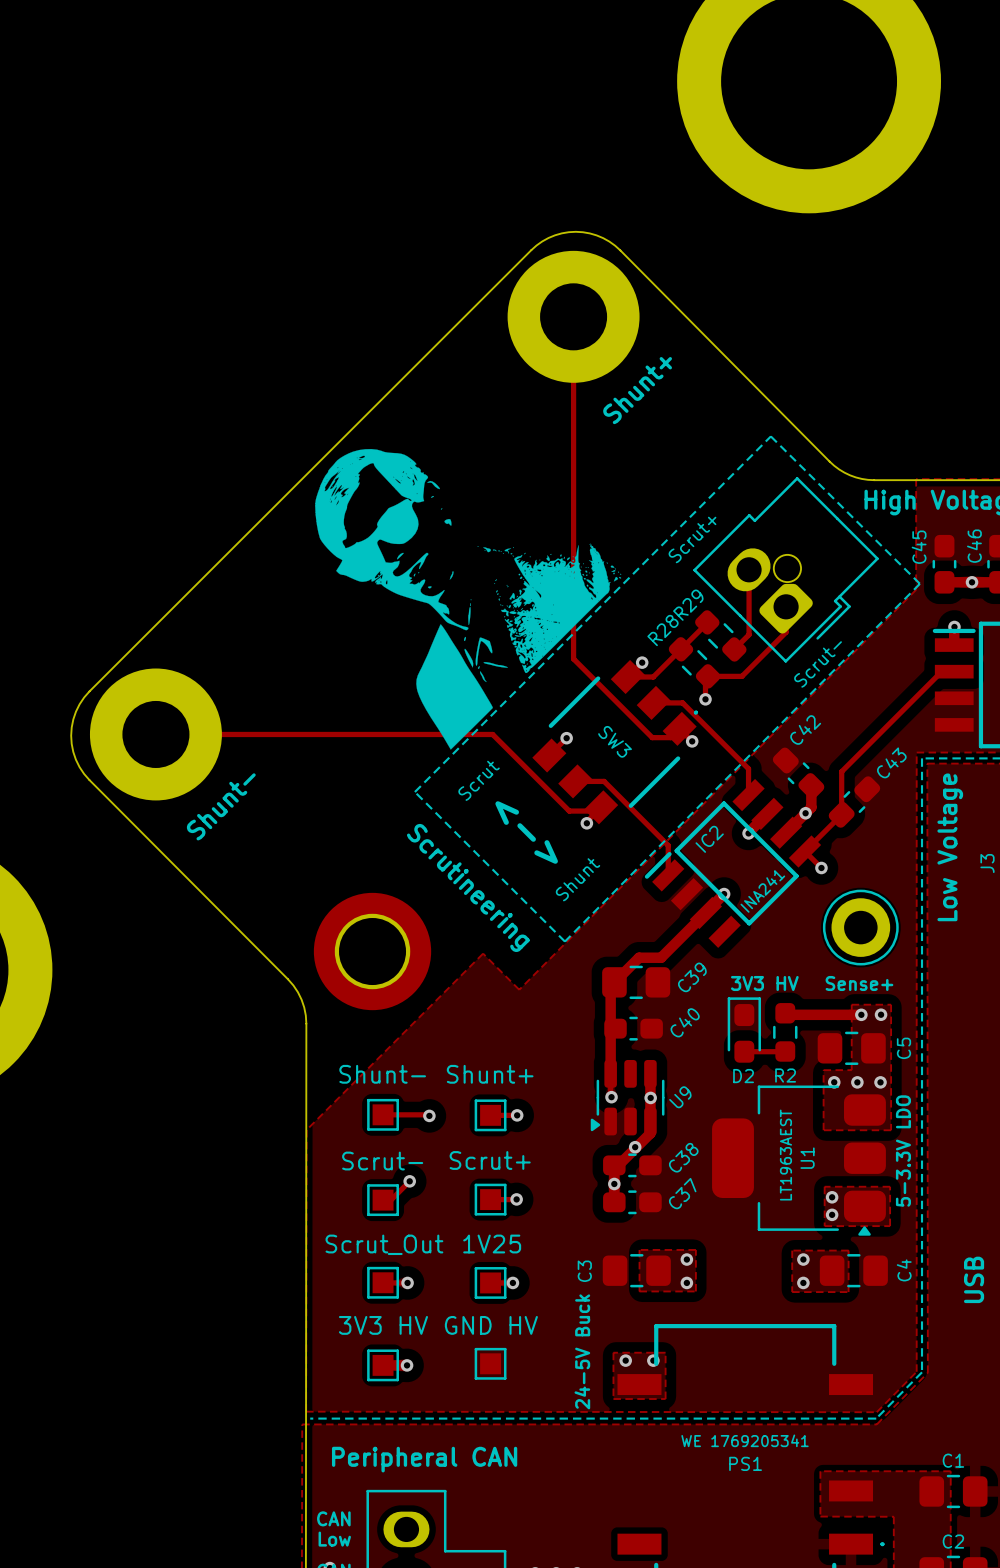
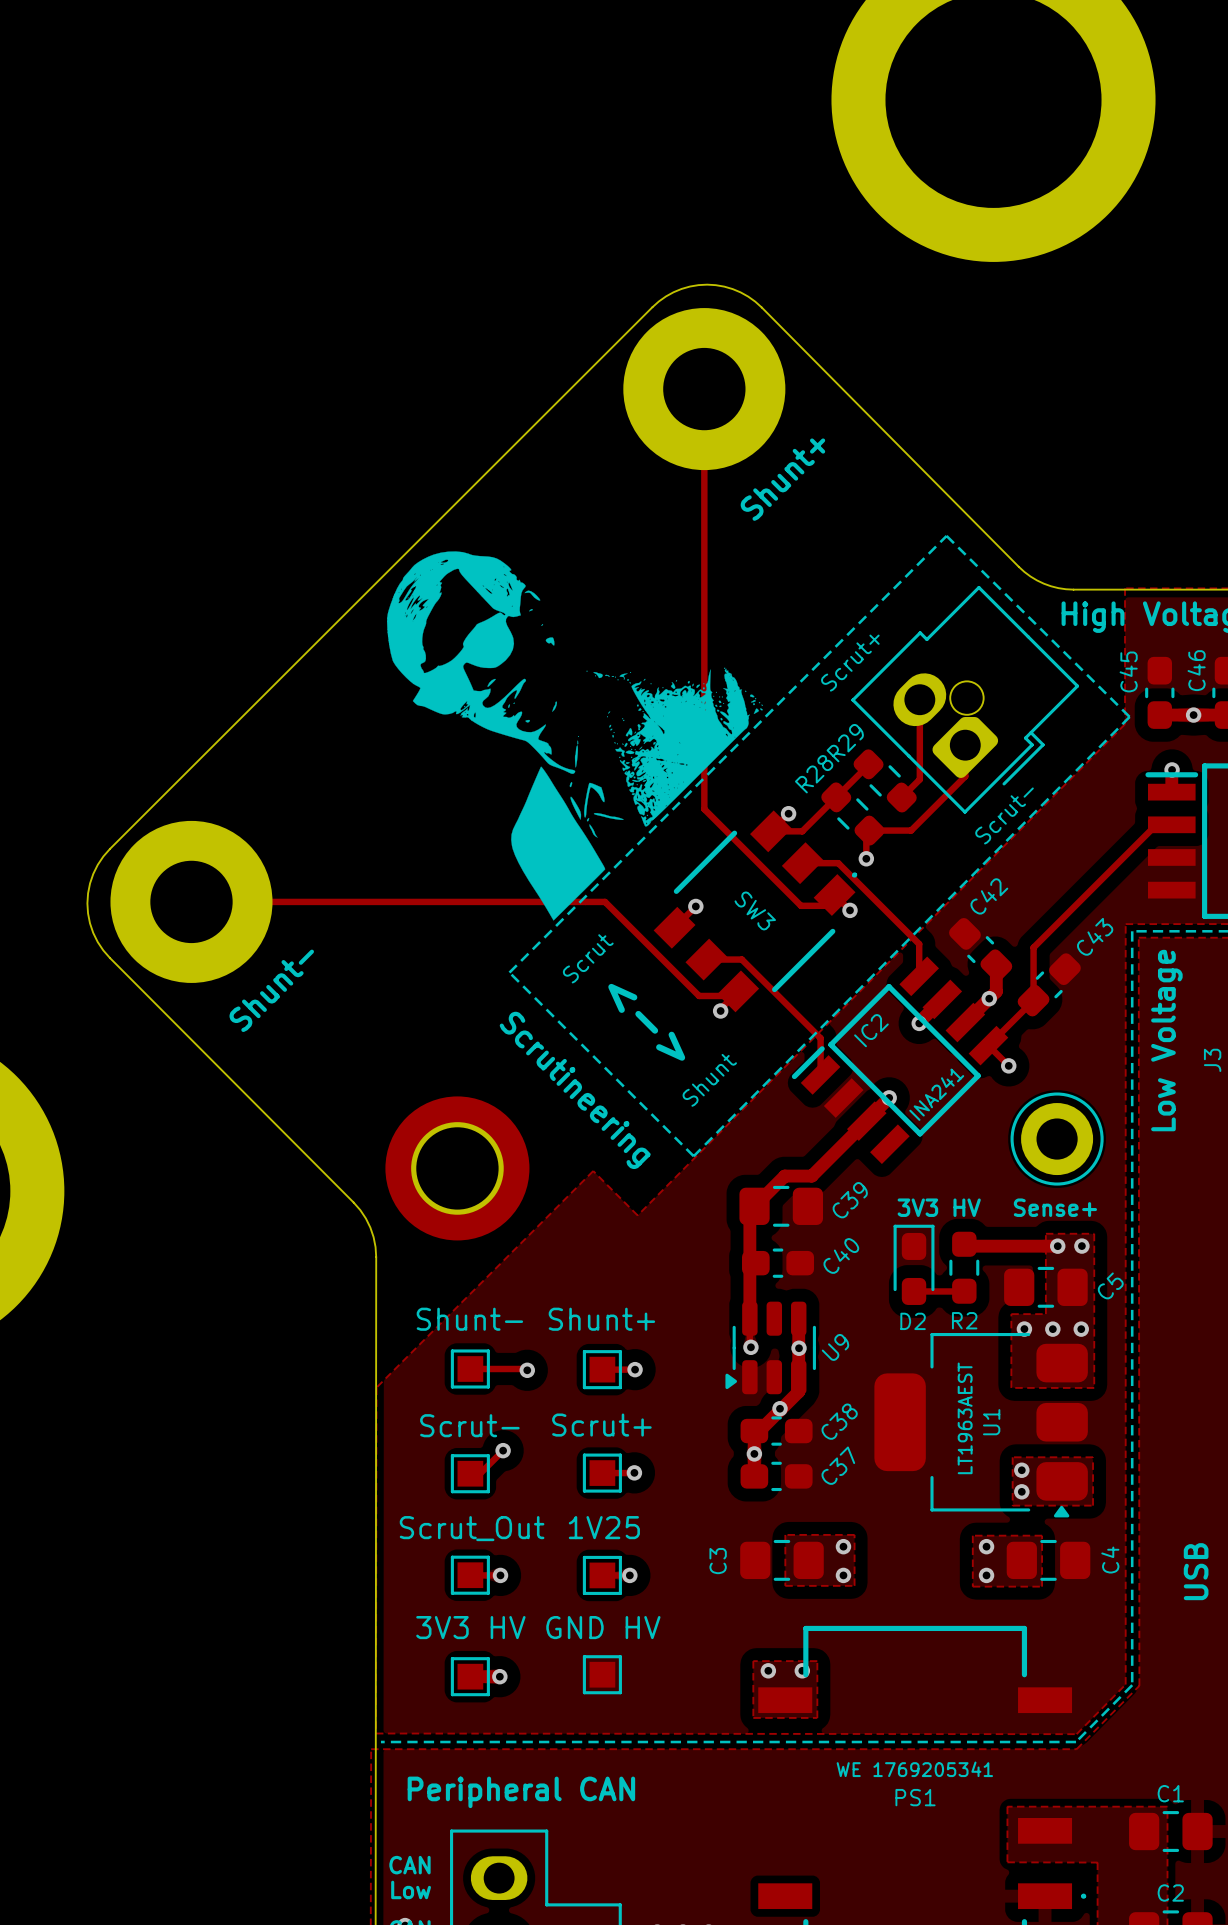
C5 name rotation: 0° (903, 1048) -> 45° clockwise (1110, 1285)
text: 5-3.3V LDO (903, 1151) -> none
text: 24-5V Buck (582, 1351) -> none

